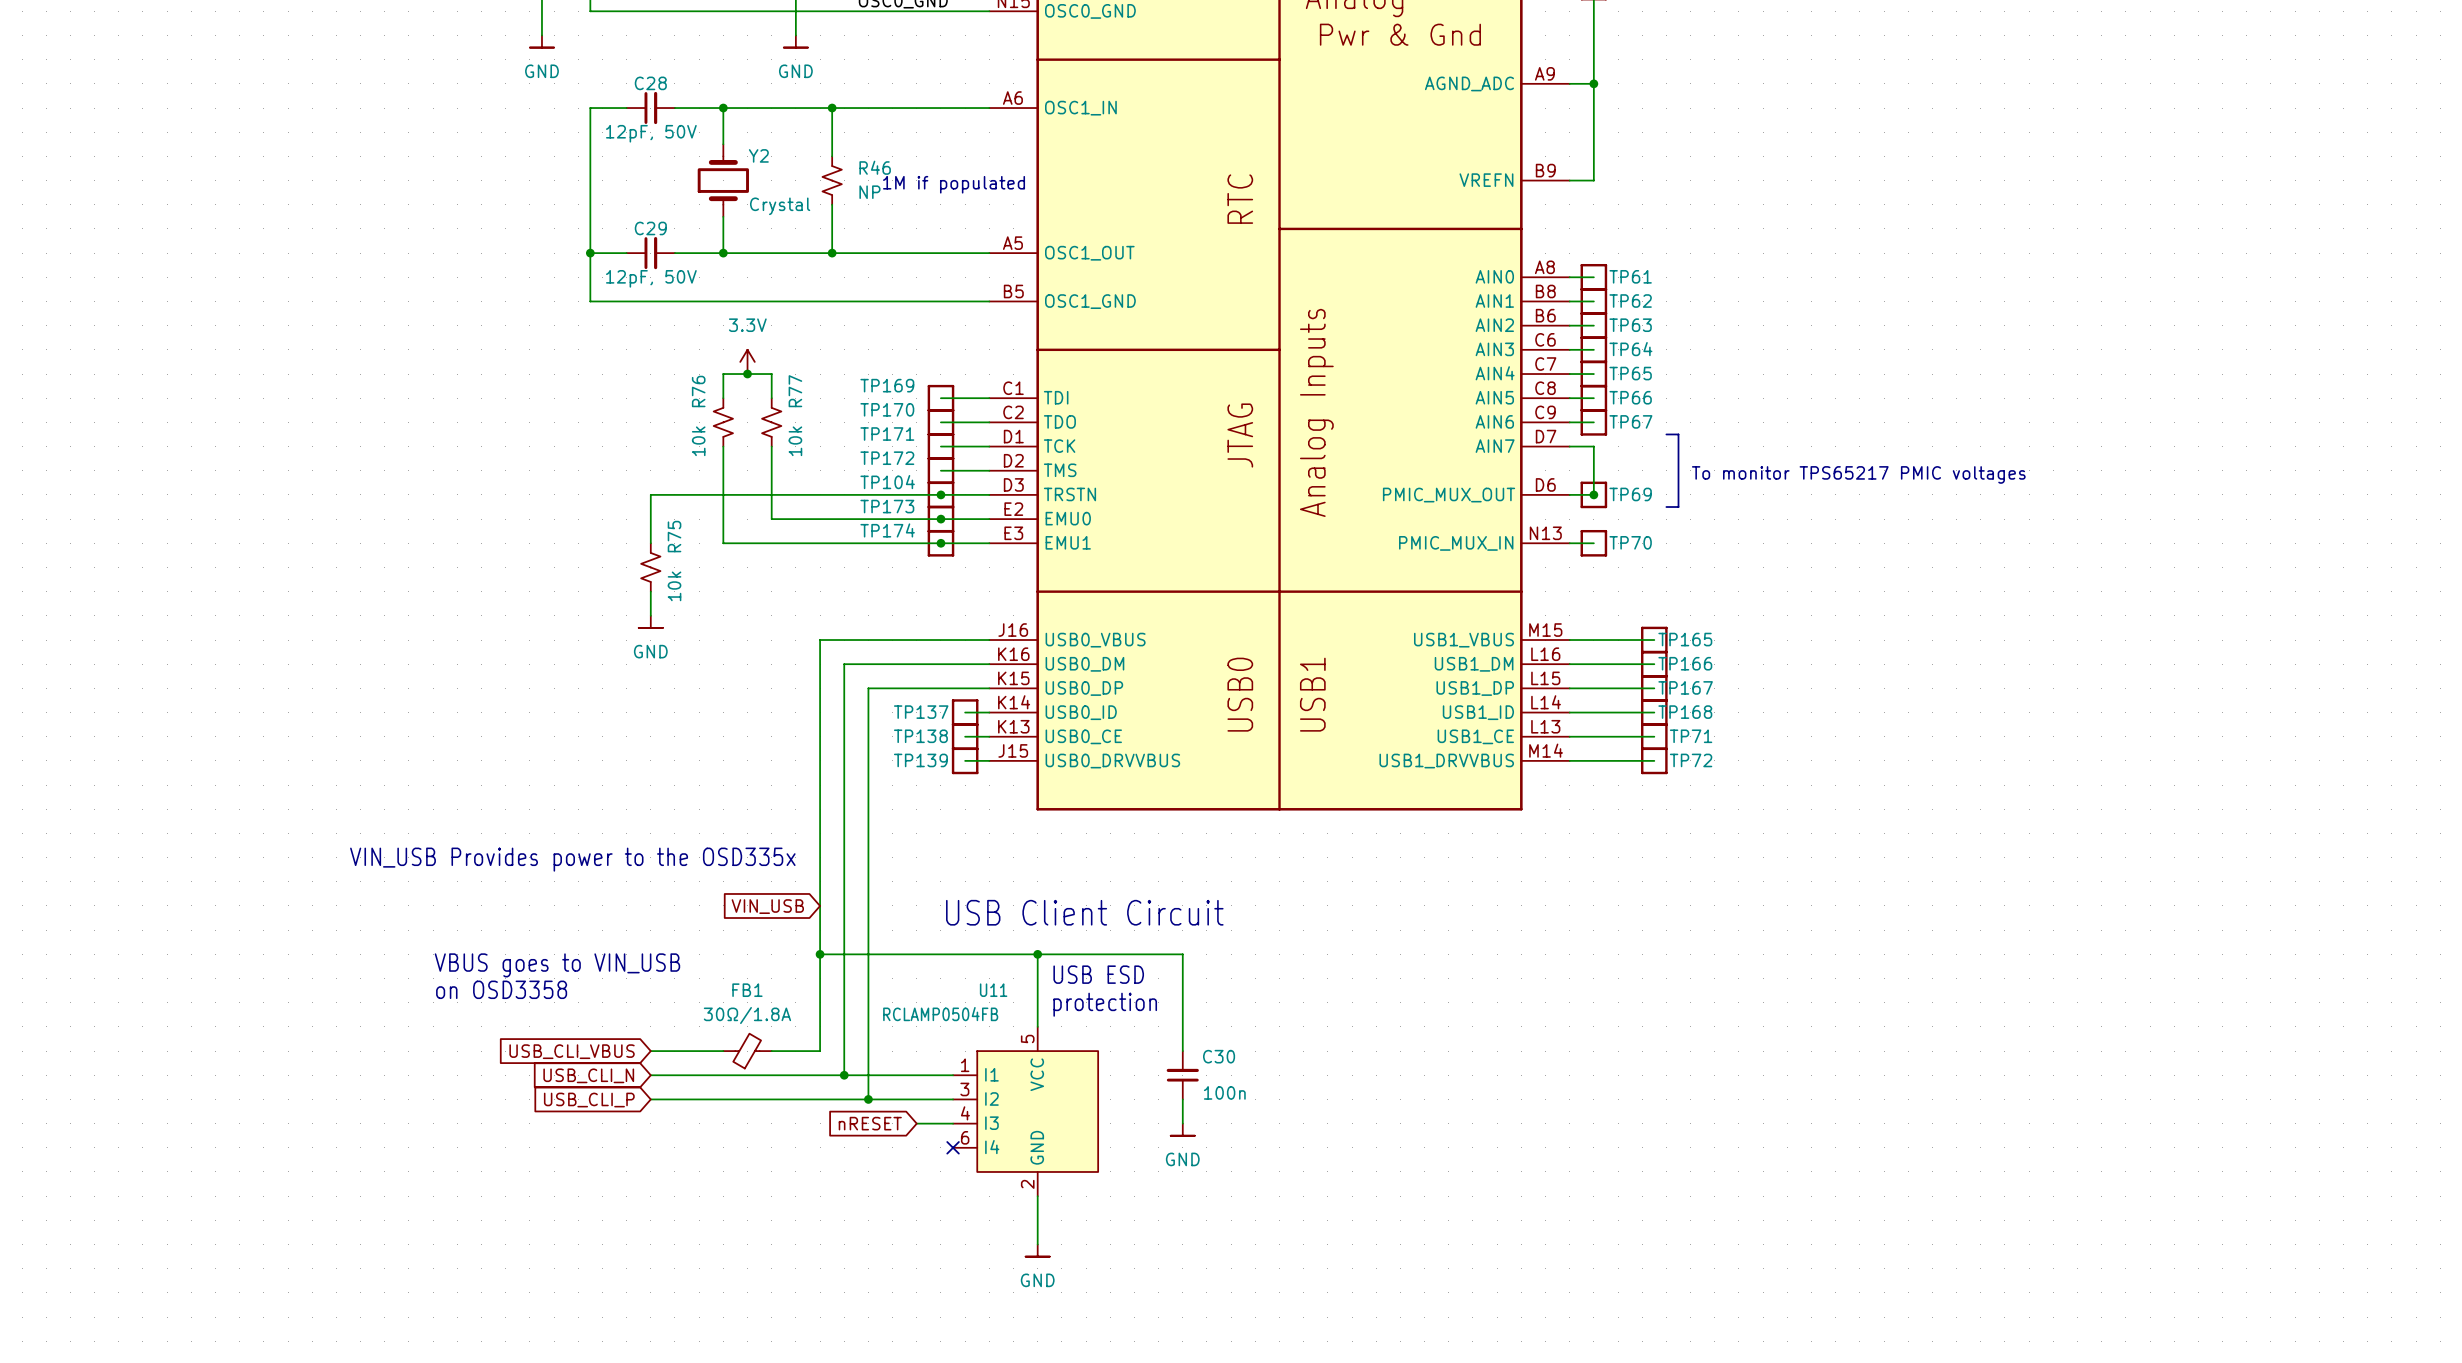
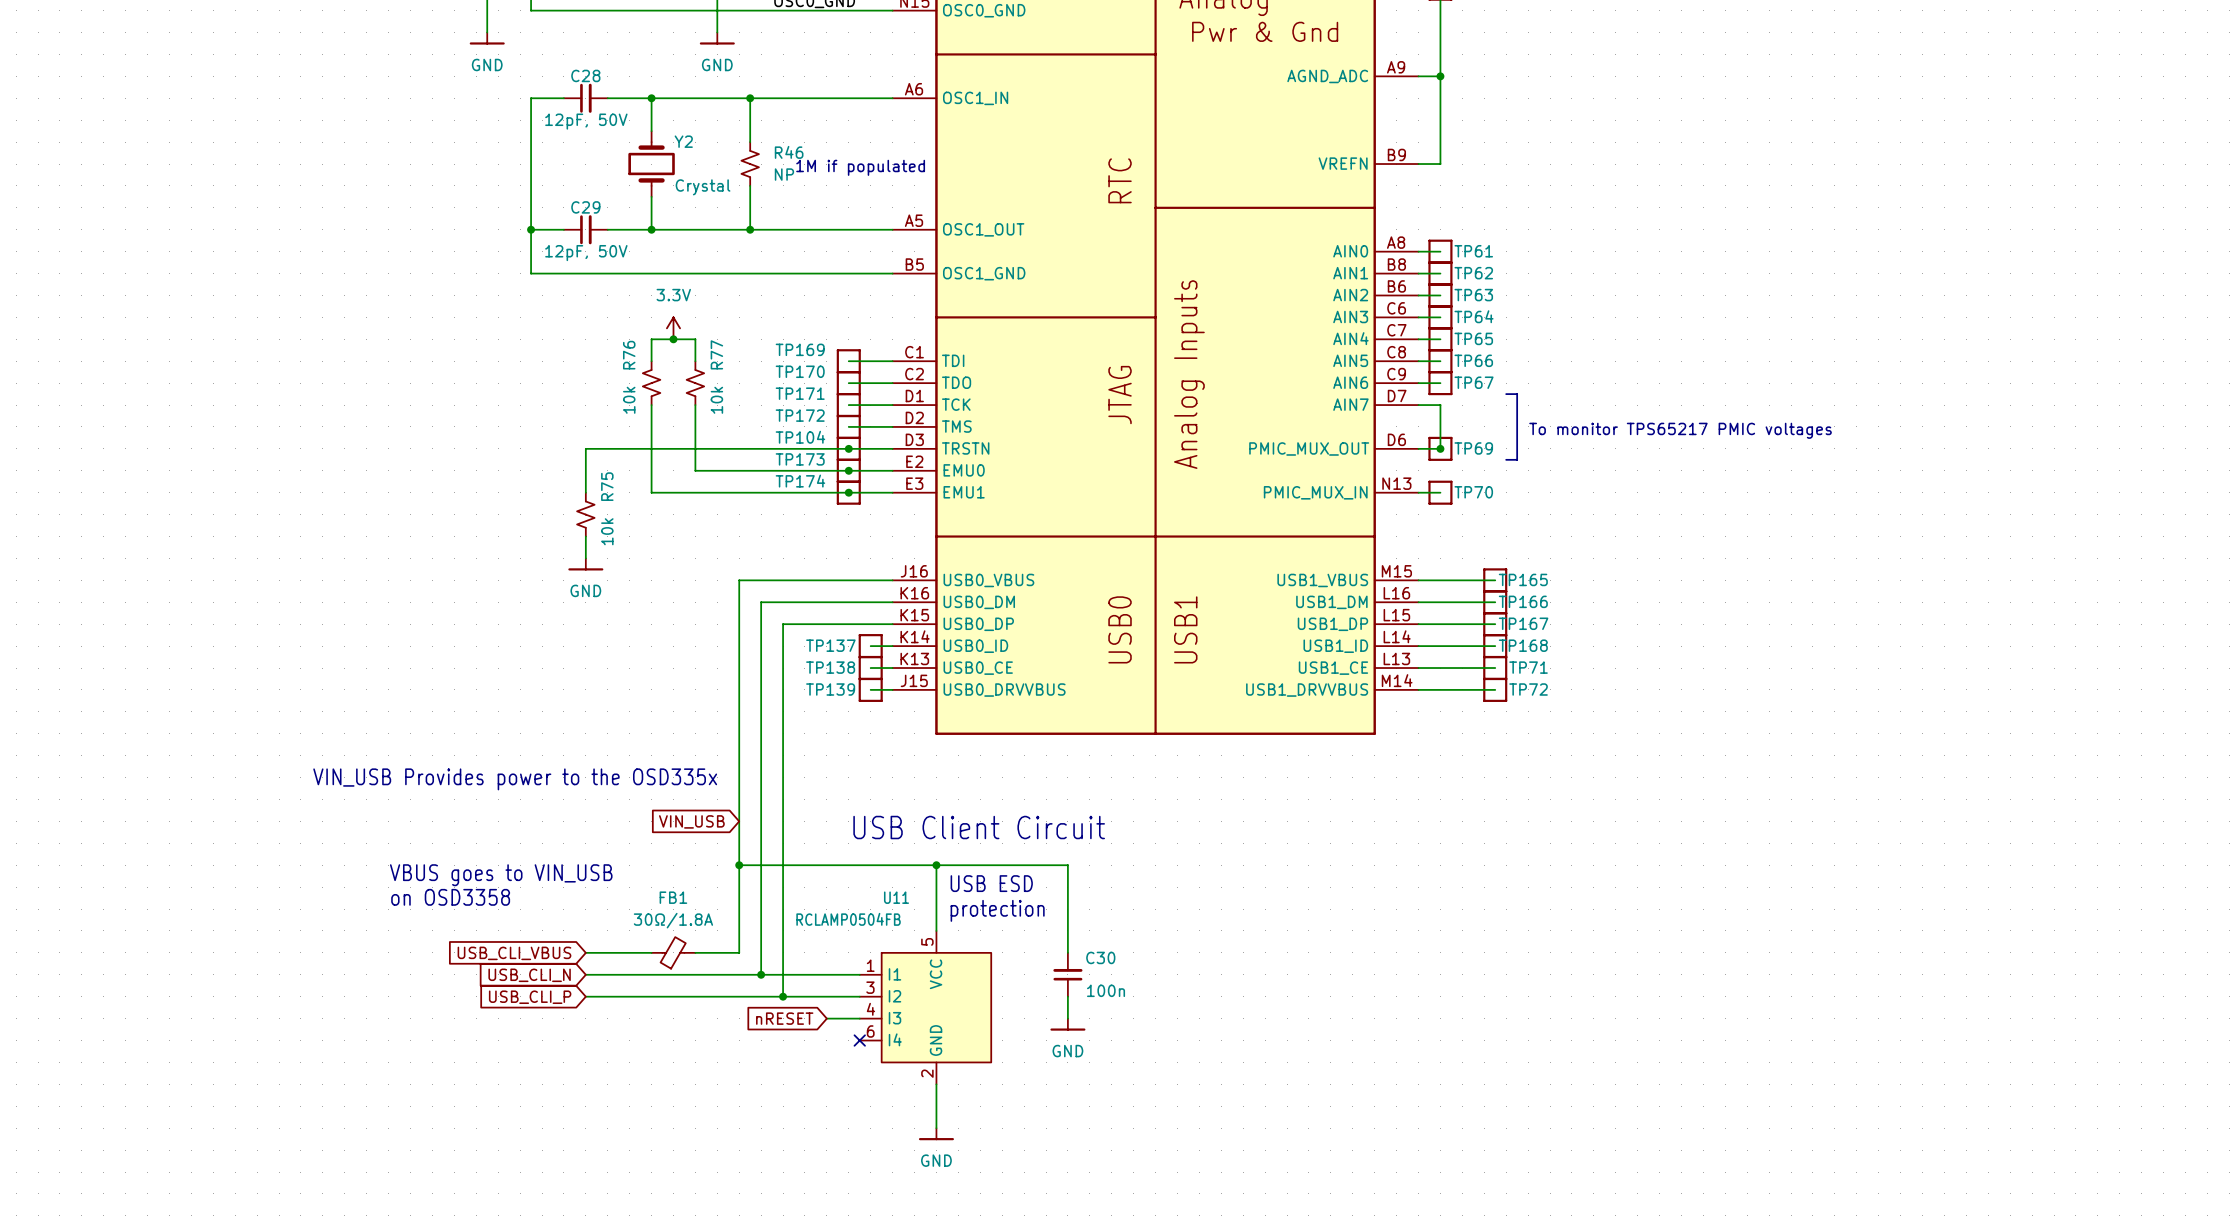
power symbol shape: [529, 35, 555, 48] -> [469, 32, 505, 45]
power symbol shape: [783, 35, 808, 48] -> [699, 32, 735, 45]
power symbol shape: [638, 615, 663, 628] -> [568, 558, 604, 571]
power symbol shape: [1170, 1123, 1195, 1136] -> [1050, 1018, 1086, 1031]
power symbol shape: [1025, 1244, 1050, 1257] -> [918, 1128, 954, 1141]

